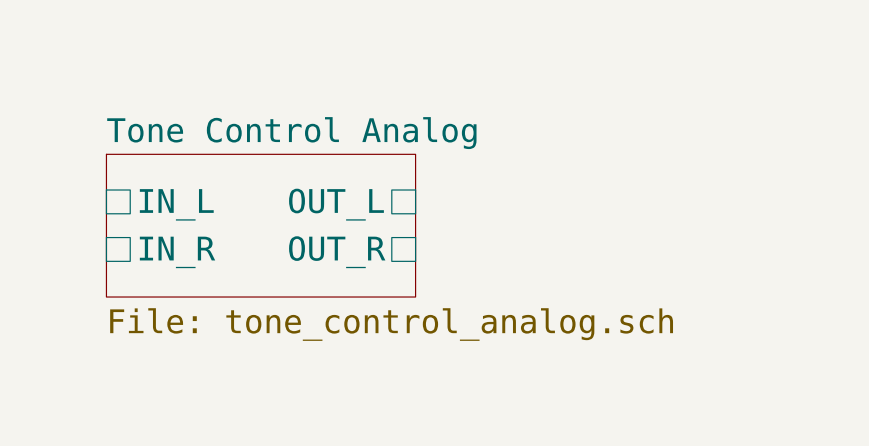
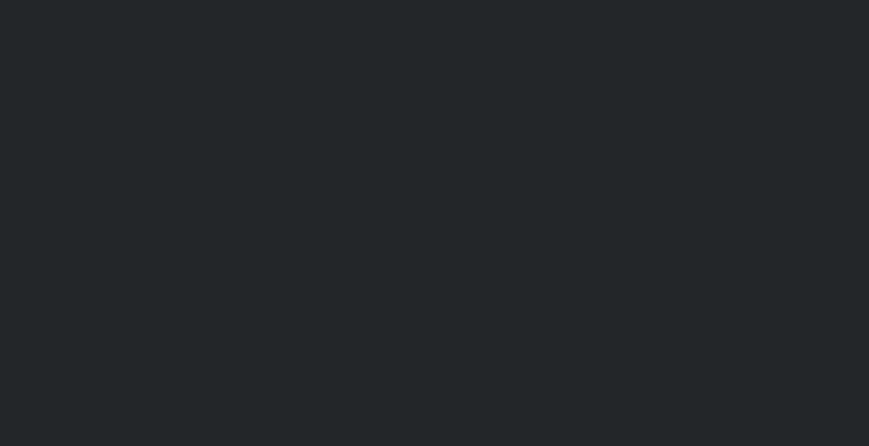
sheet pin: IN_L (176, 204) -> none
sheet pin: OUT_L (336, 204) -> none
sheet Tone Control Analog: File: tone_control_analog.sch (261, 225) -> none
sheet pin: IN_R (177, 252) -> none
sheet pin: OUT_R (337, 252) -> none

